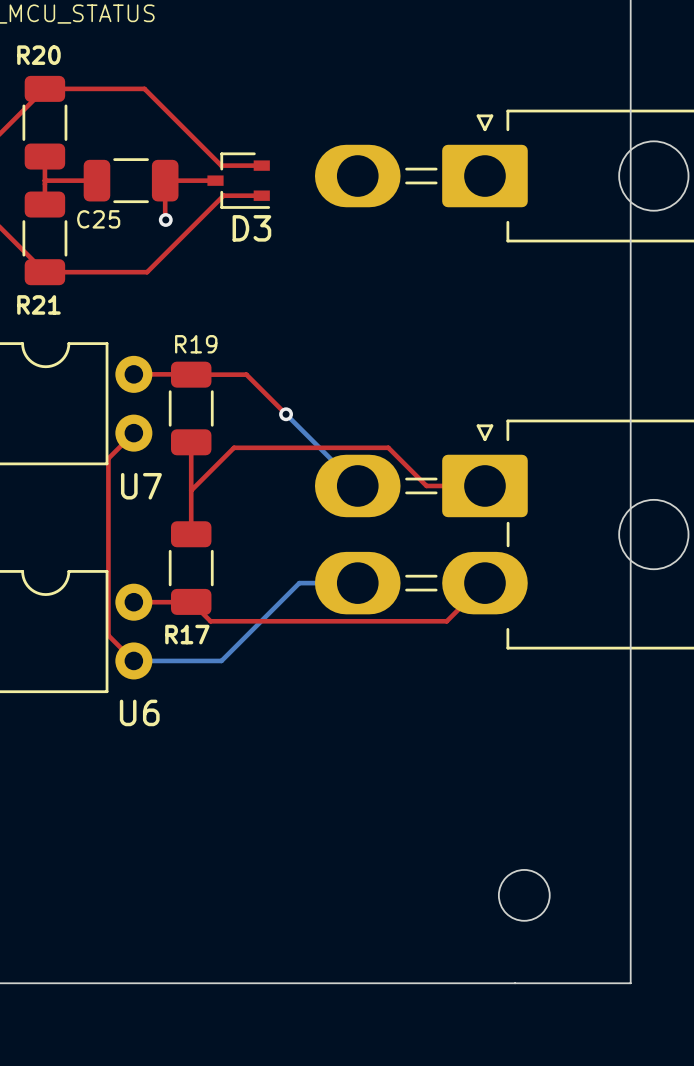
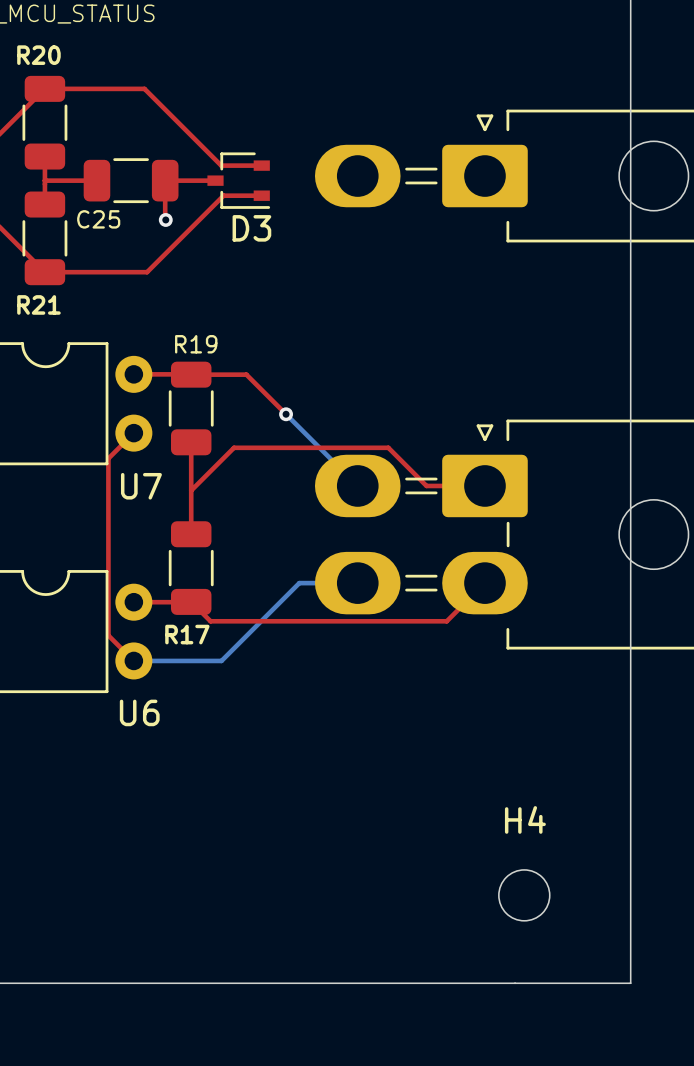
H4 name: none -> H4 (525, 819)

